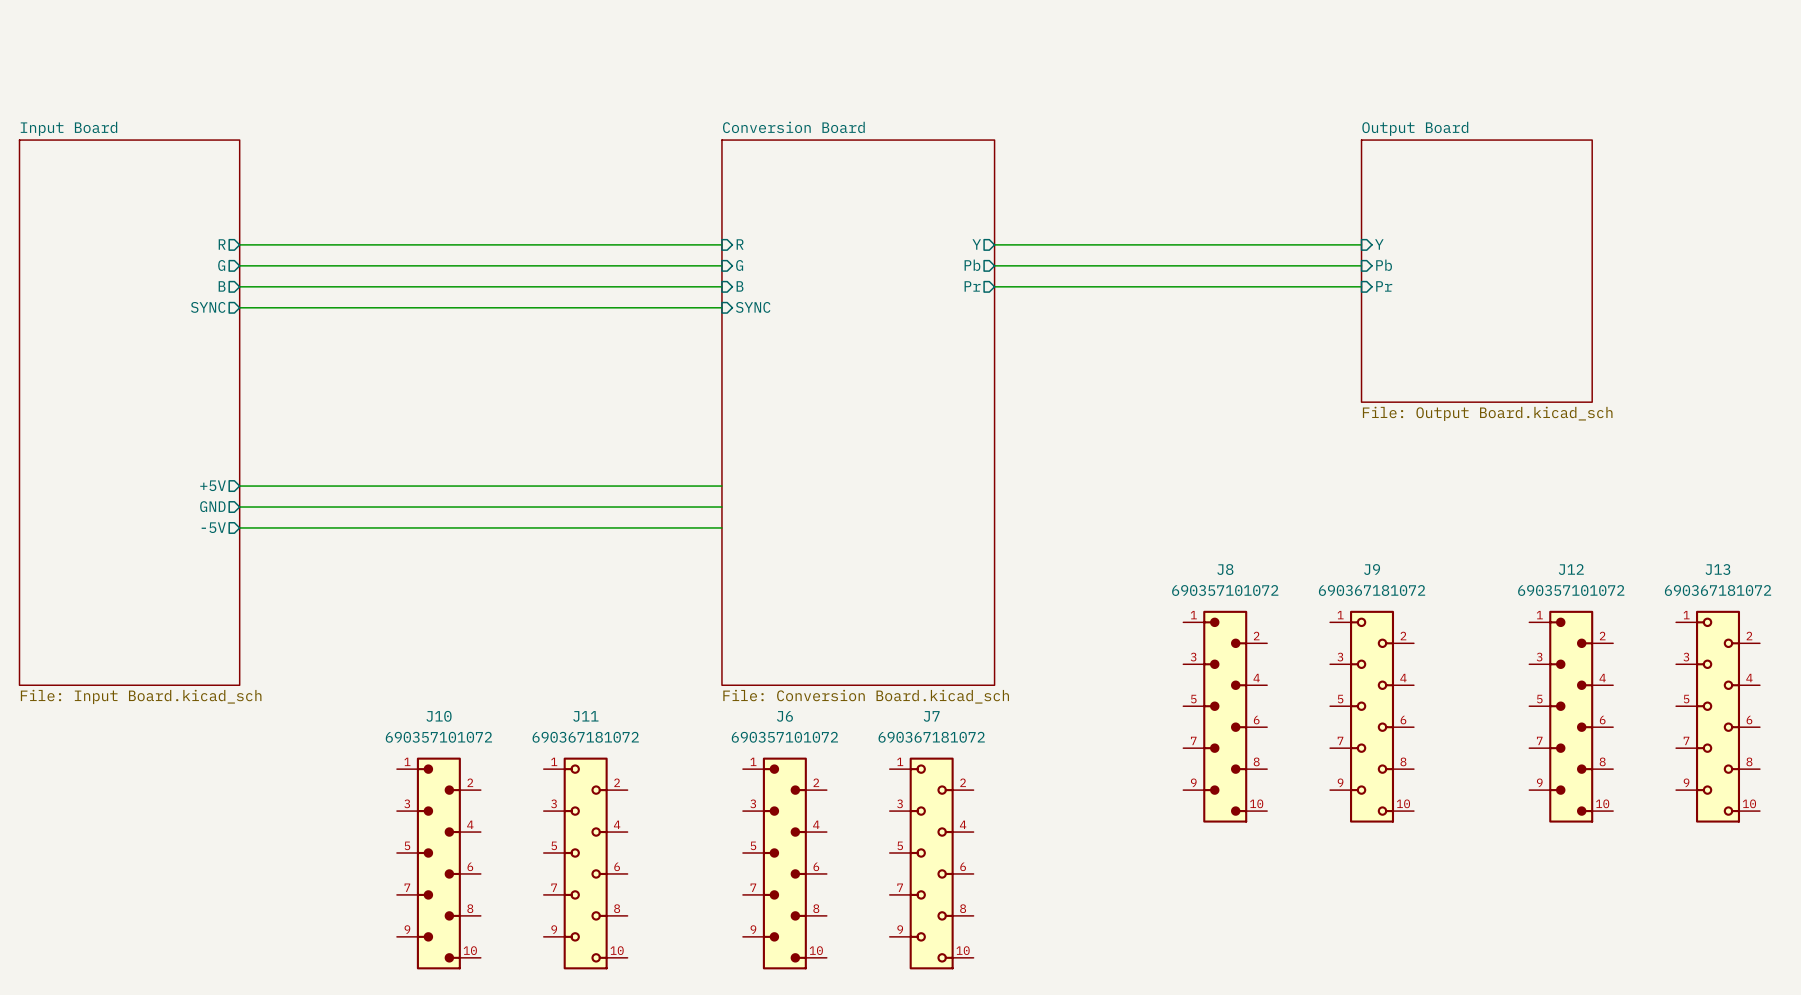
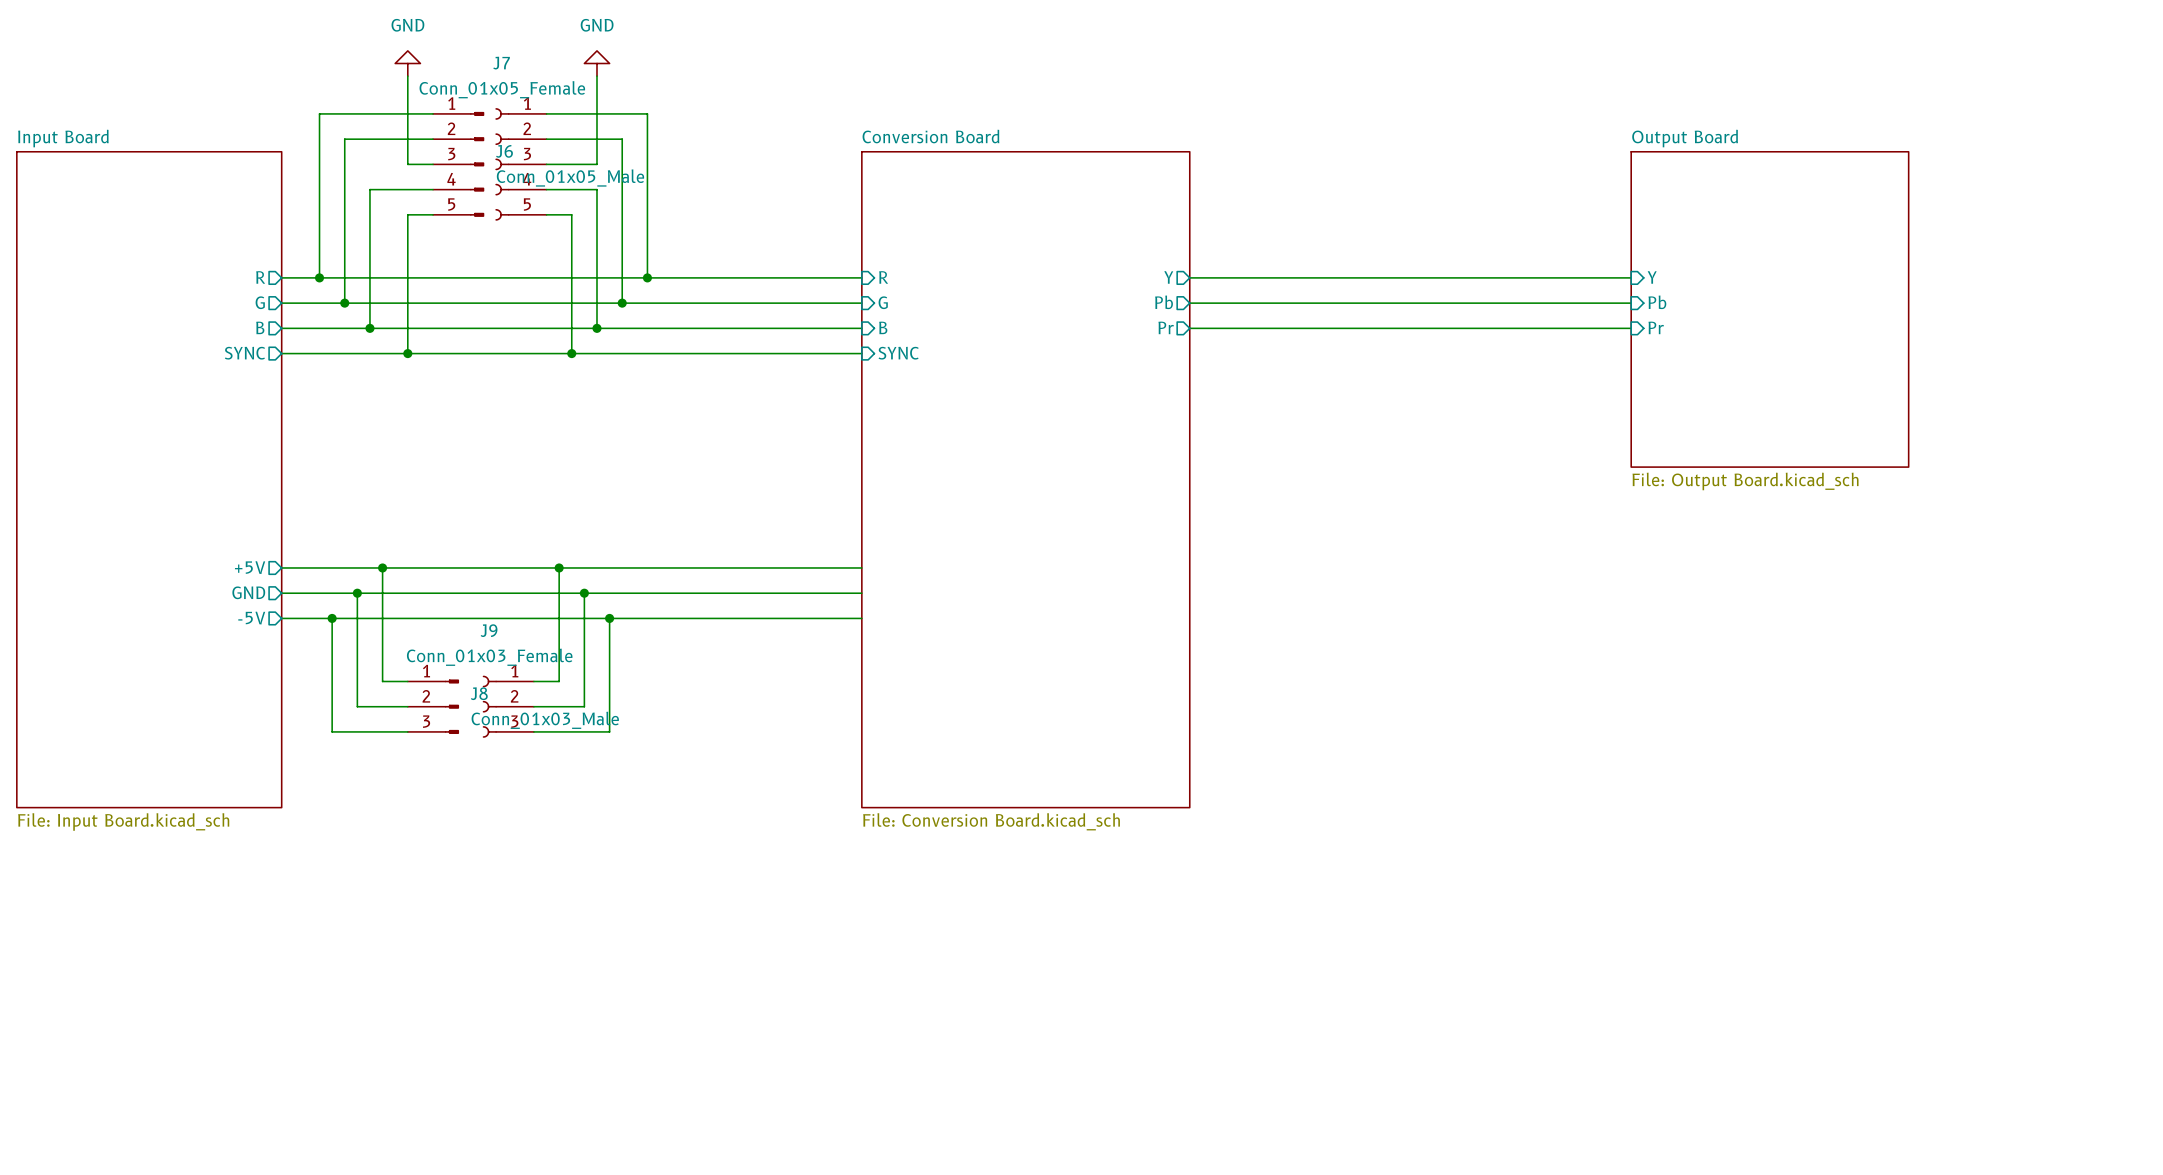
power symbol: none -> GND (407, 63)
power symbol: none -> GND (596, 63)
wire: none -> (407, 76) (407, 164) (433, 164)
wire: none -> (596, 76) (596, 164) (546, 164)
wire: none -> (433, 113) (319, 113) (319, 277)
wire: none -> (546, 113) (647, 113) (647, 277)
wire: none -> (433, 139) (344, 139) (344, 303)
wire: none -> (546, 139) (622, 139) (622, 303)
wire: none -> (433, 189) (369, 189) (369, 328)
wire: none -> (546, 189) (596, 189) (596, 328)
wire: none -> (433, 214) (407, 214) (407, 353)
wire: none -> (546, 214) (571, 214) (571, 353)
junction: none -> (319, 277)
junction: none -> (647, 277)
junction: none -> (344, 303)
junction: none -> (622, 303)
junction: none -> (369, 328)
junction: none -> (596, 328)
junction: none -> (407, 353)
junction: none -> (571, 353)
wire: none -> (382, 567) (382, 681) (407, 681)
junction: none -> (382, 567)
wire: none -> (559, 567) (559, 681) (533, 681)
junction: none -> (559, 567)
wire: none -> (357, 593) (357, 706) (407, 706)
junction: none -> (357, 593)
wire: none -> (584, 593) (584, 706) (533, 706)
junction: none -> (584, 593)
wire: none -> (332, 618) (332, 731) (407, 731)
junction: none -> (332, 618)
wire: none -> (609, 618) (609, 731) (533, 731)
junction: none -> (609, 618)
J8 name position: J8 (1225, 569) -> J8 (479, 693)
J9 name position: J9 (1372, 569) -> J9 (489, 630)
J8 value: 690357101072 (1225, 590) -> Conn_01x03_Male (545, 720)
J9 value: 690367181072 (1372, 590) -> Conn_01x03_Female (489, 657)
J8 symbol: [1183, 610, 1268, 823] -> [407, 679, 460, 734]
J9 symbol: [1330, 610, 1414, 823] -> [482, 675, 534, 738]
J6 name position: J6 (784, 716) -> J6 (504, 151)
J7 name position: J7 (931, 716) -> J7 (501, 63)
J12: 690357101072 (1571, 716) -> none
J13: 690367181072 (1718, 716) -> none
J6 value: 690357101072 (784, 737) -> Conn_01x05_Male (570, 178)
J7 value: 690367181072 (931, 737) -> Conn_01x05_Female (502, 89)
J6 symbol: [742, 757, 827, 970] -> [433, 111, 485, 217]
J7 symbol: [889, 757, 974, 970] -> [495, 108, 547, 221]
J10: 690357101072 (438, 863) -> none
J11: 690367181072 (585, 863) -> none

